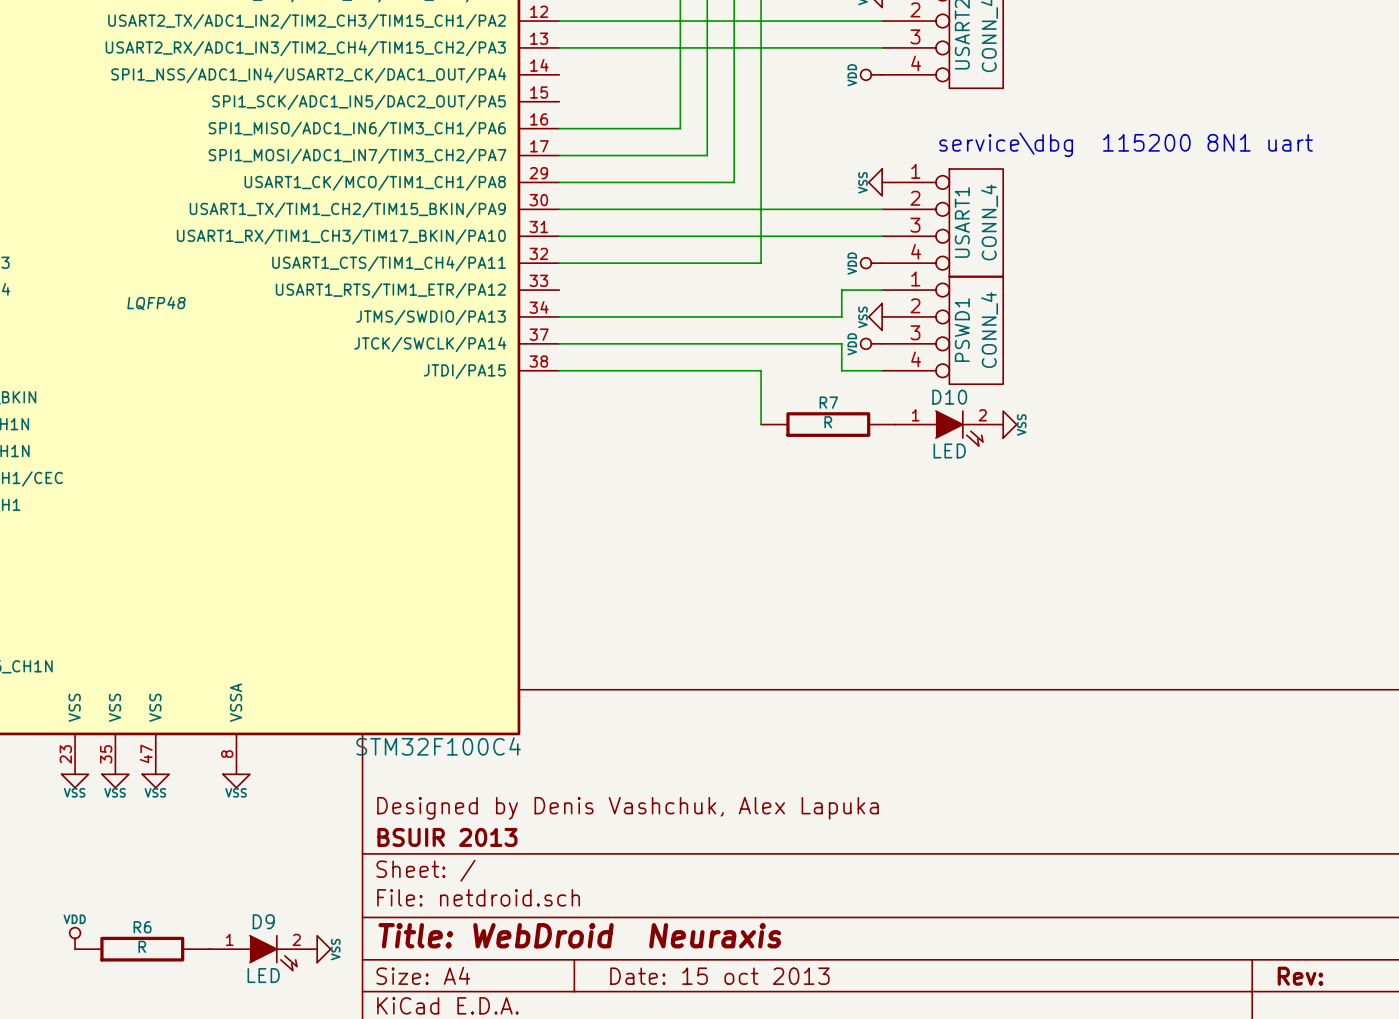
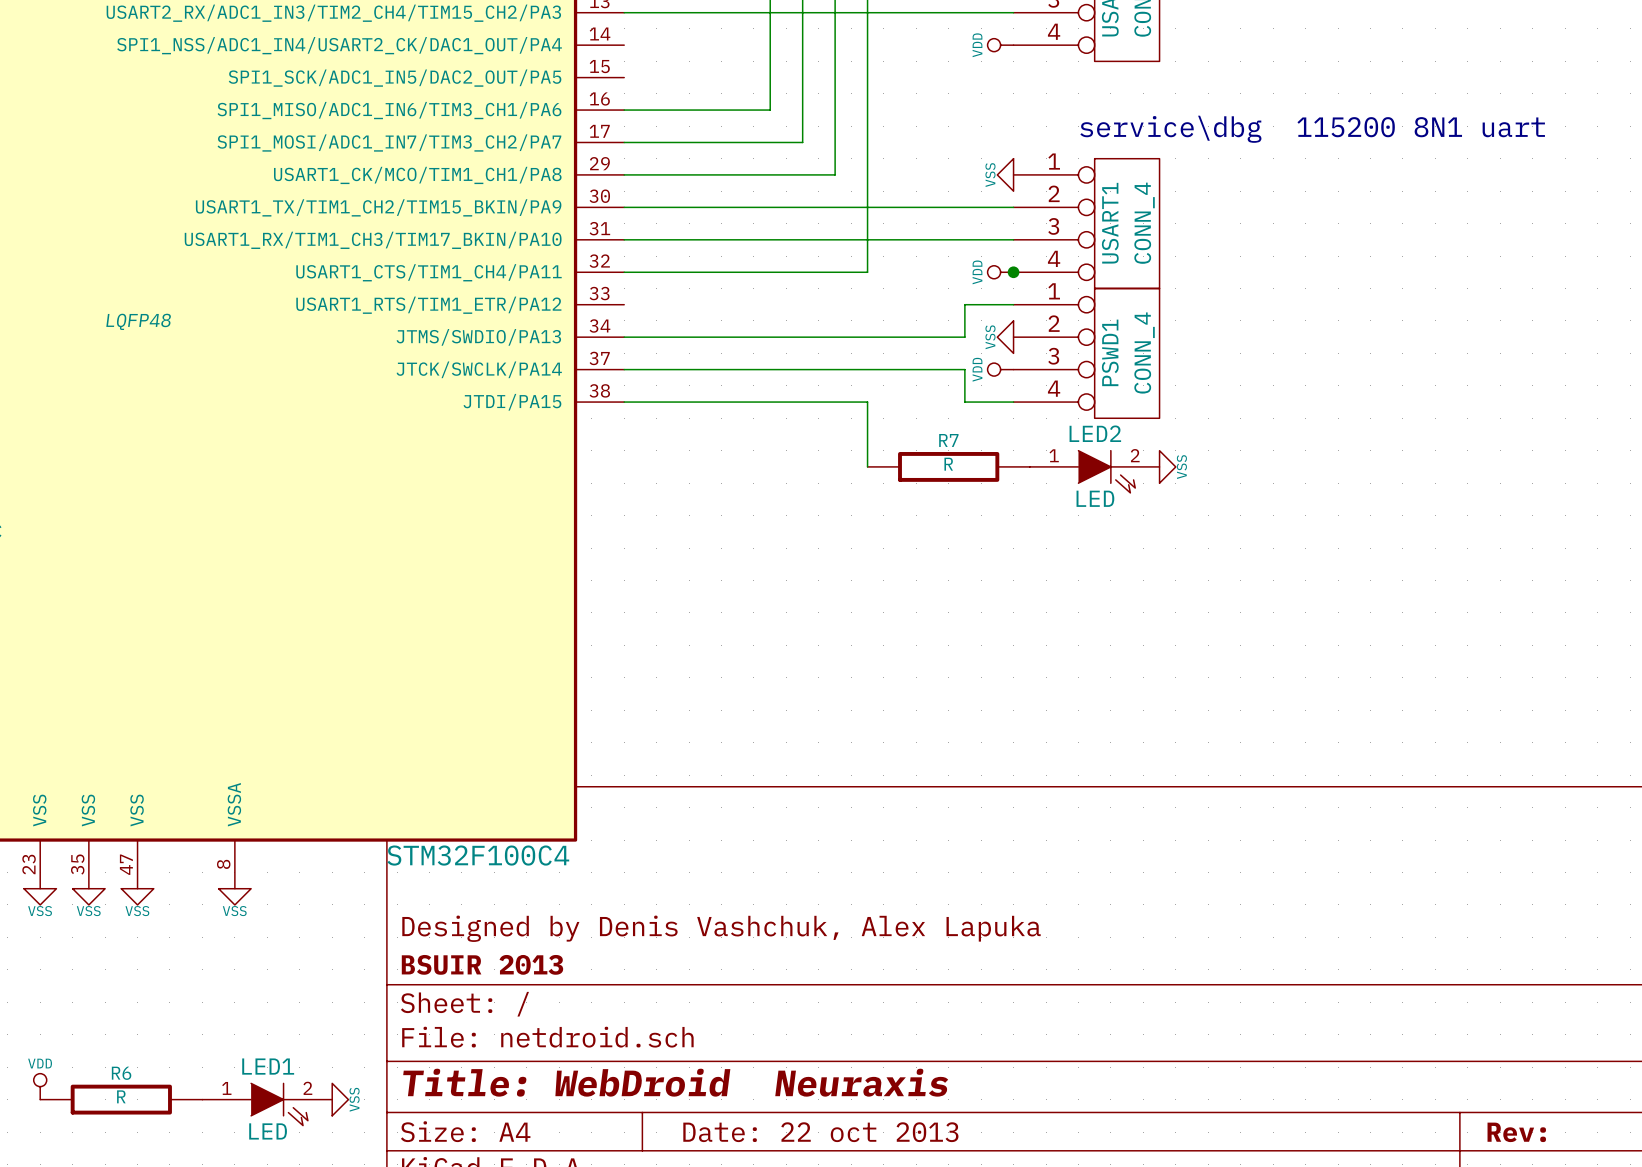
junction: none -> (1013, 272)
D10 name: D10 (949, 397) -> LED2 (1095, 433)
D9 name: D9 (263, 921) -> LED1 (268, 1066)
title block: Date: 15 oct 2013 (719, 976) -> Date: 22 oct 2013 (820, 1132)

